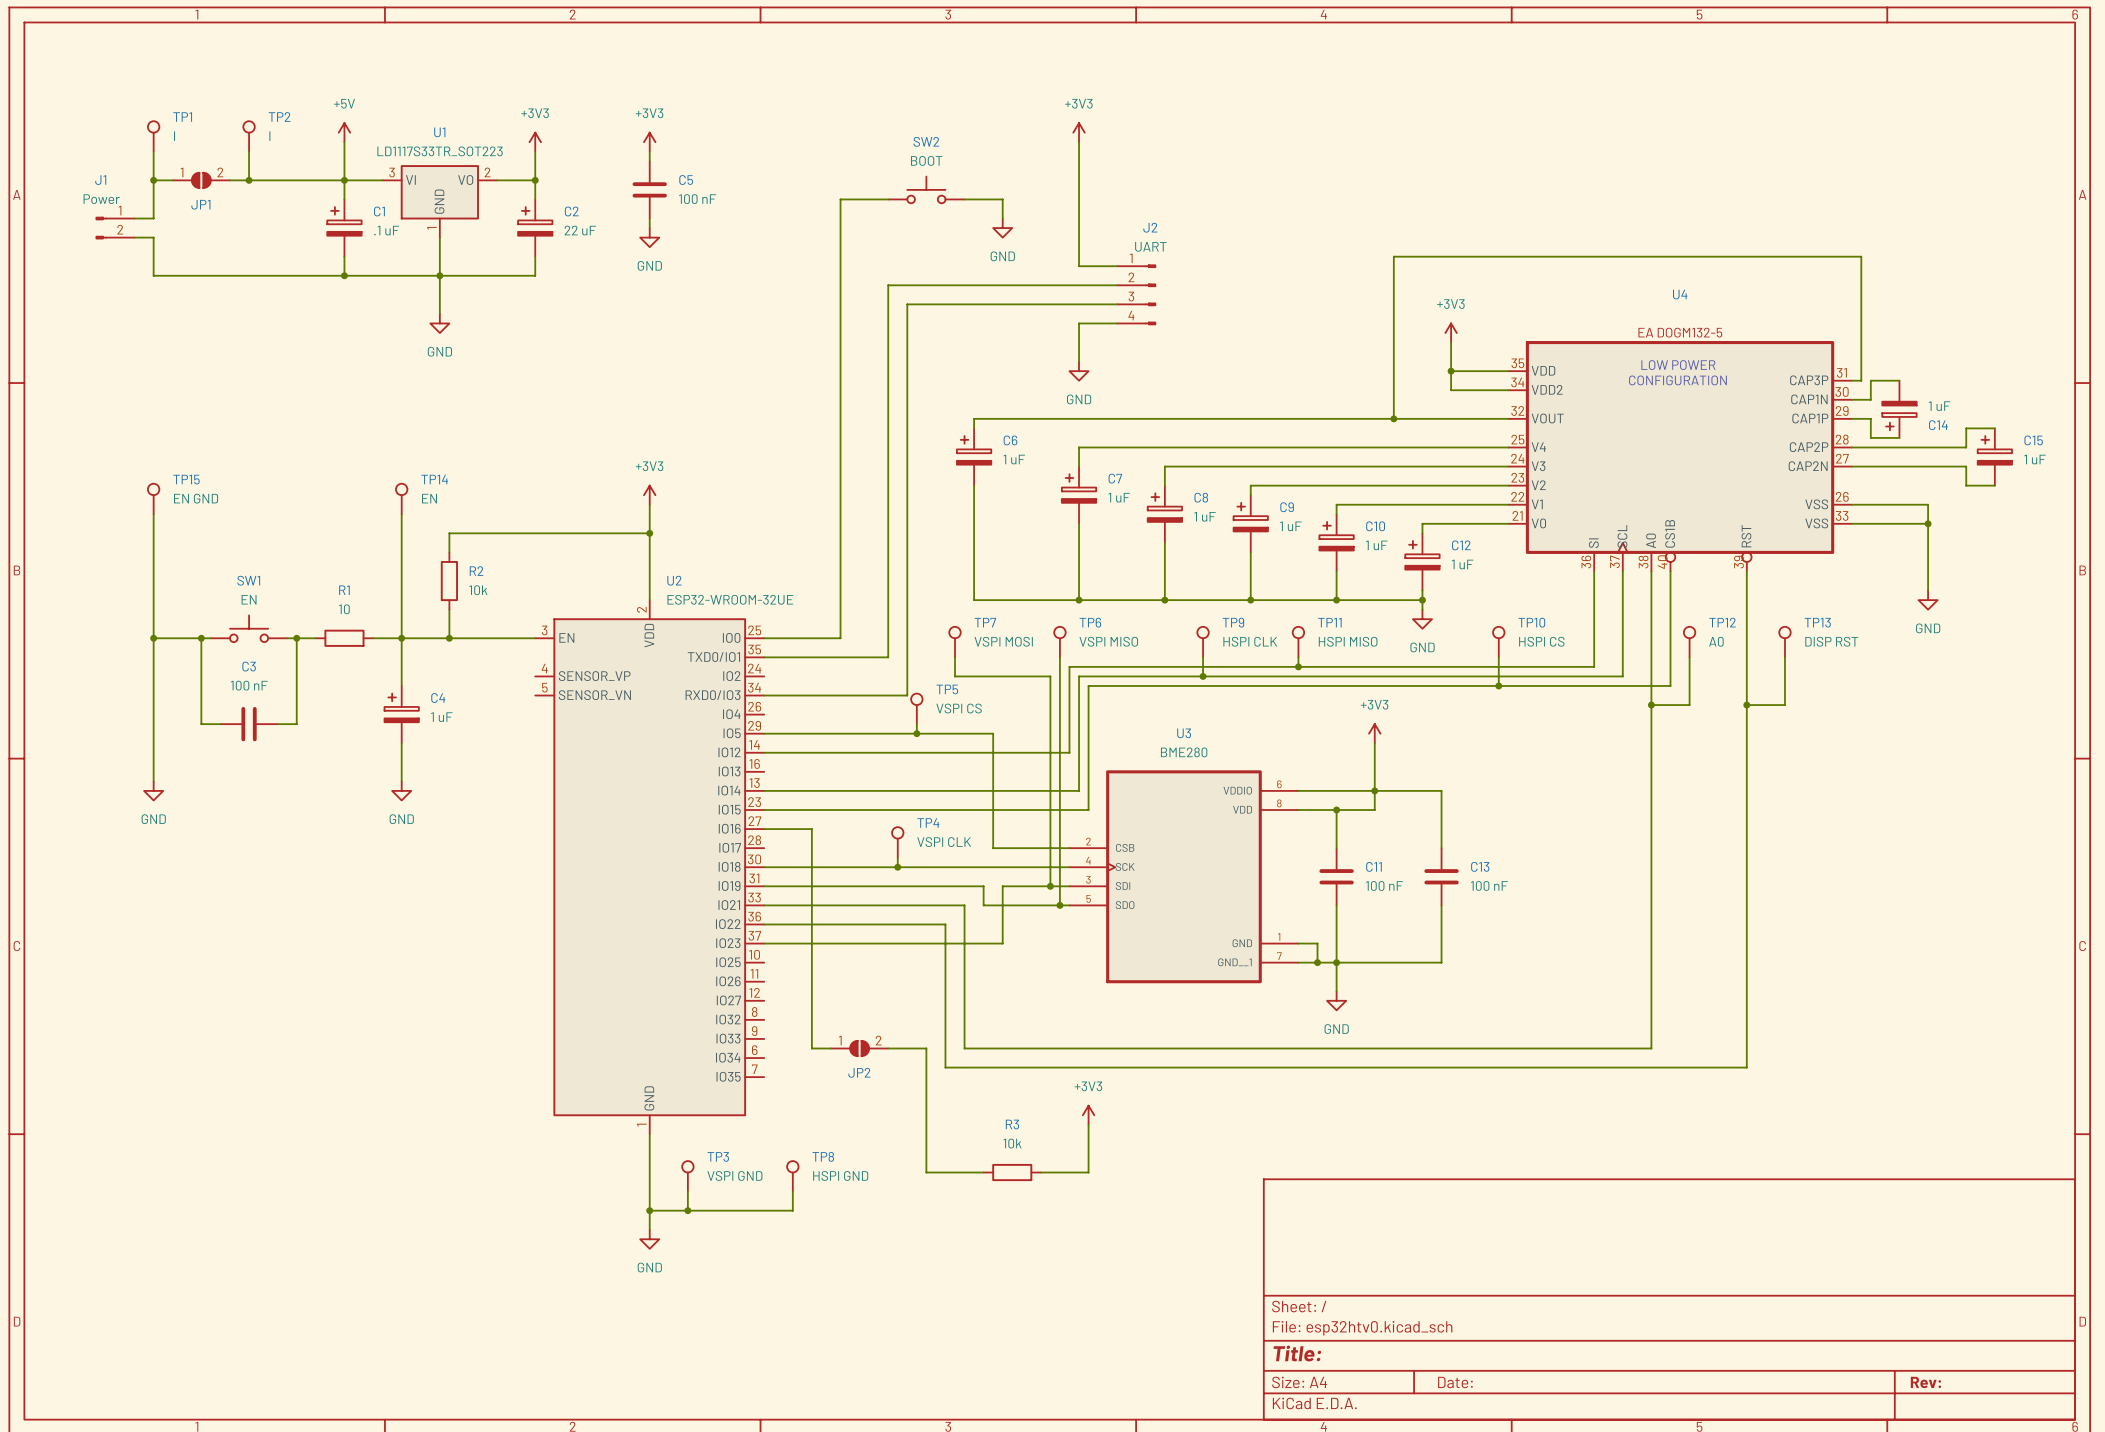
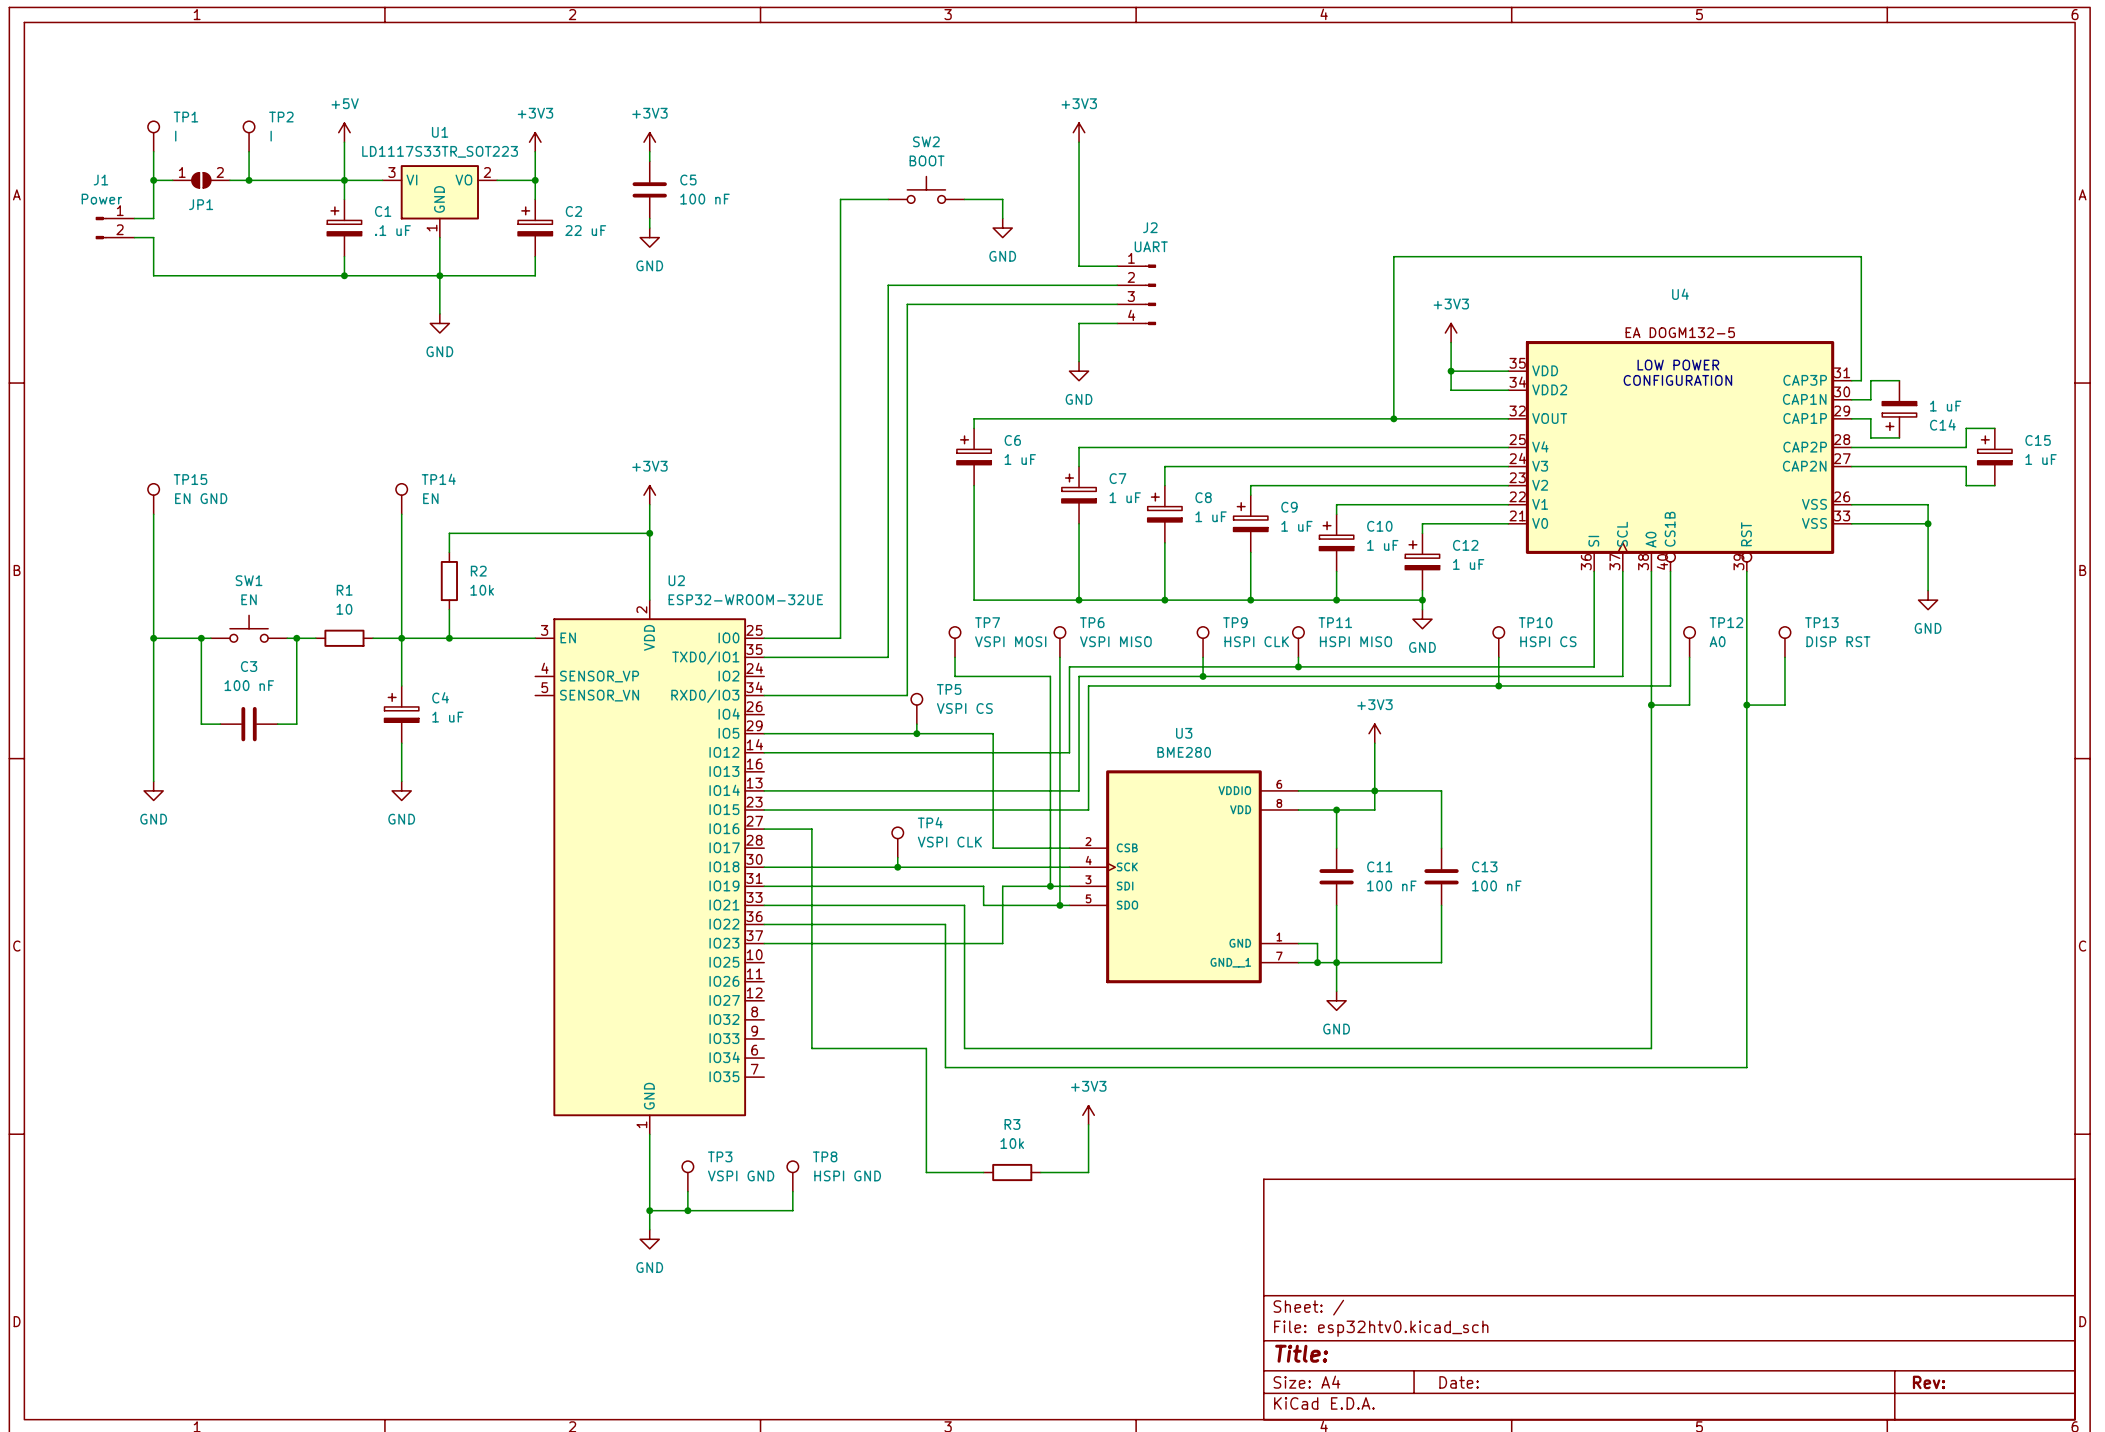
JP2: (859, 1048) -> none

